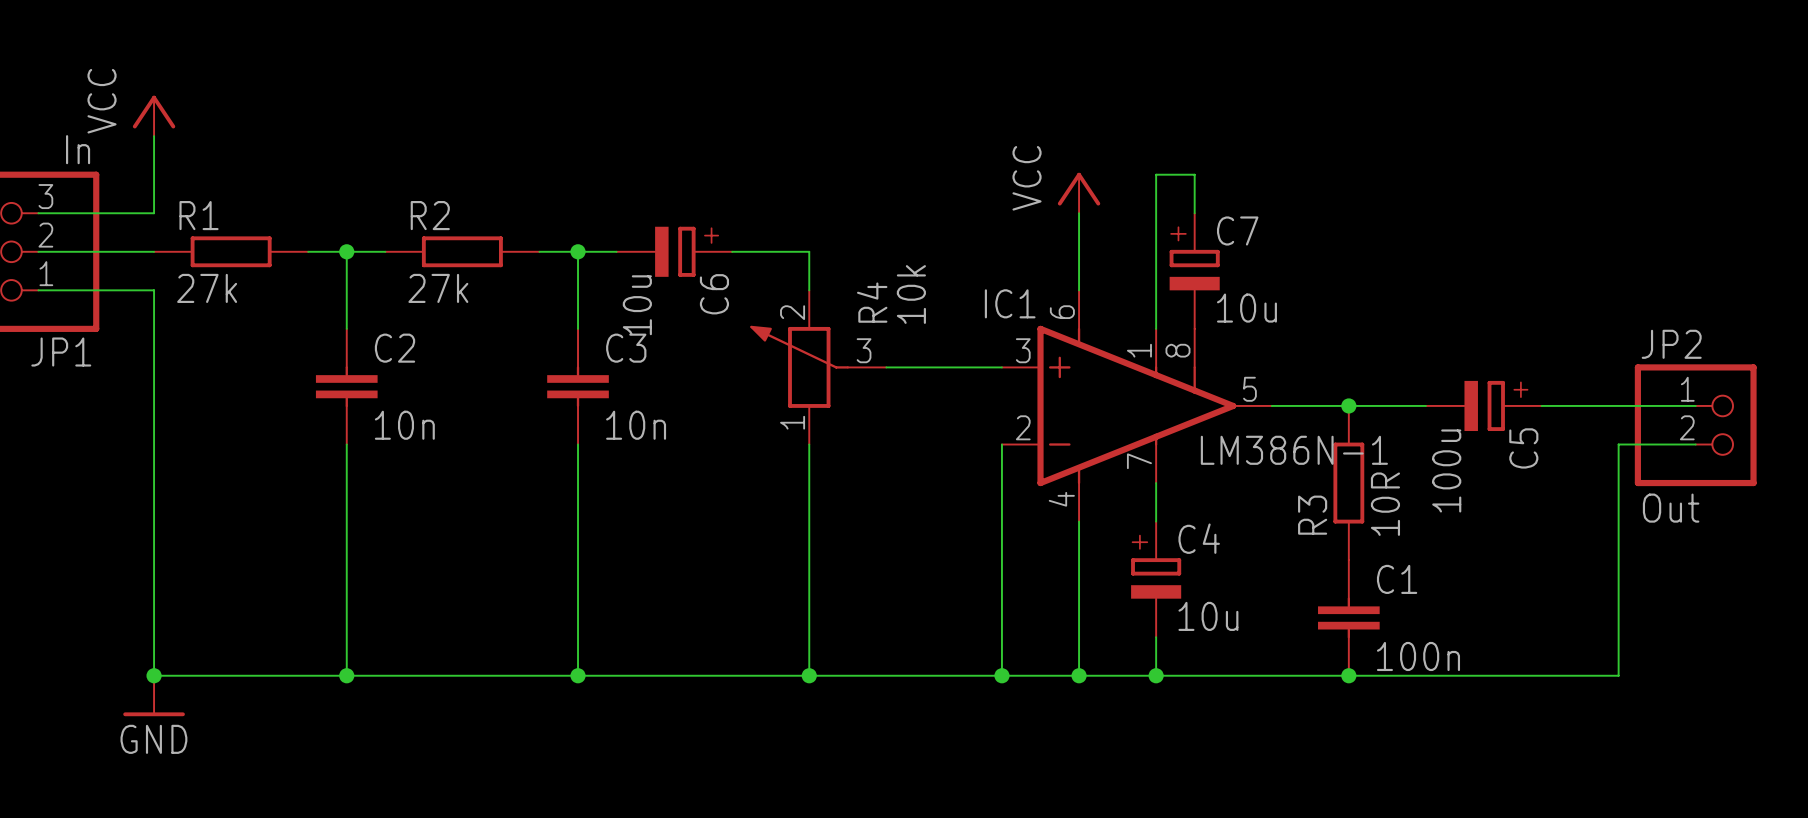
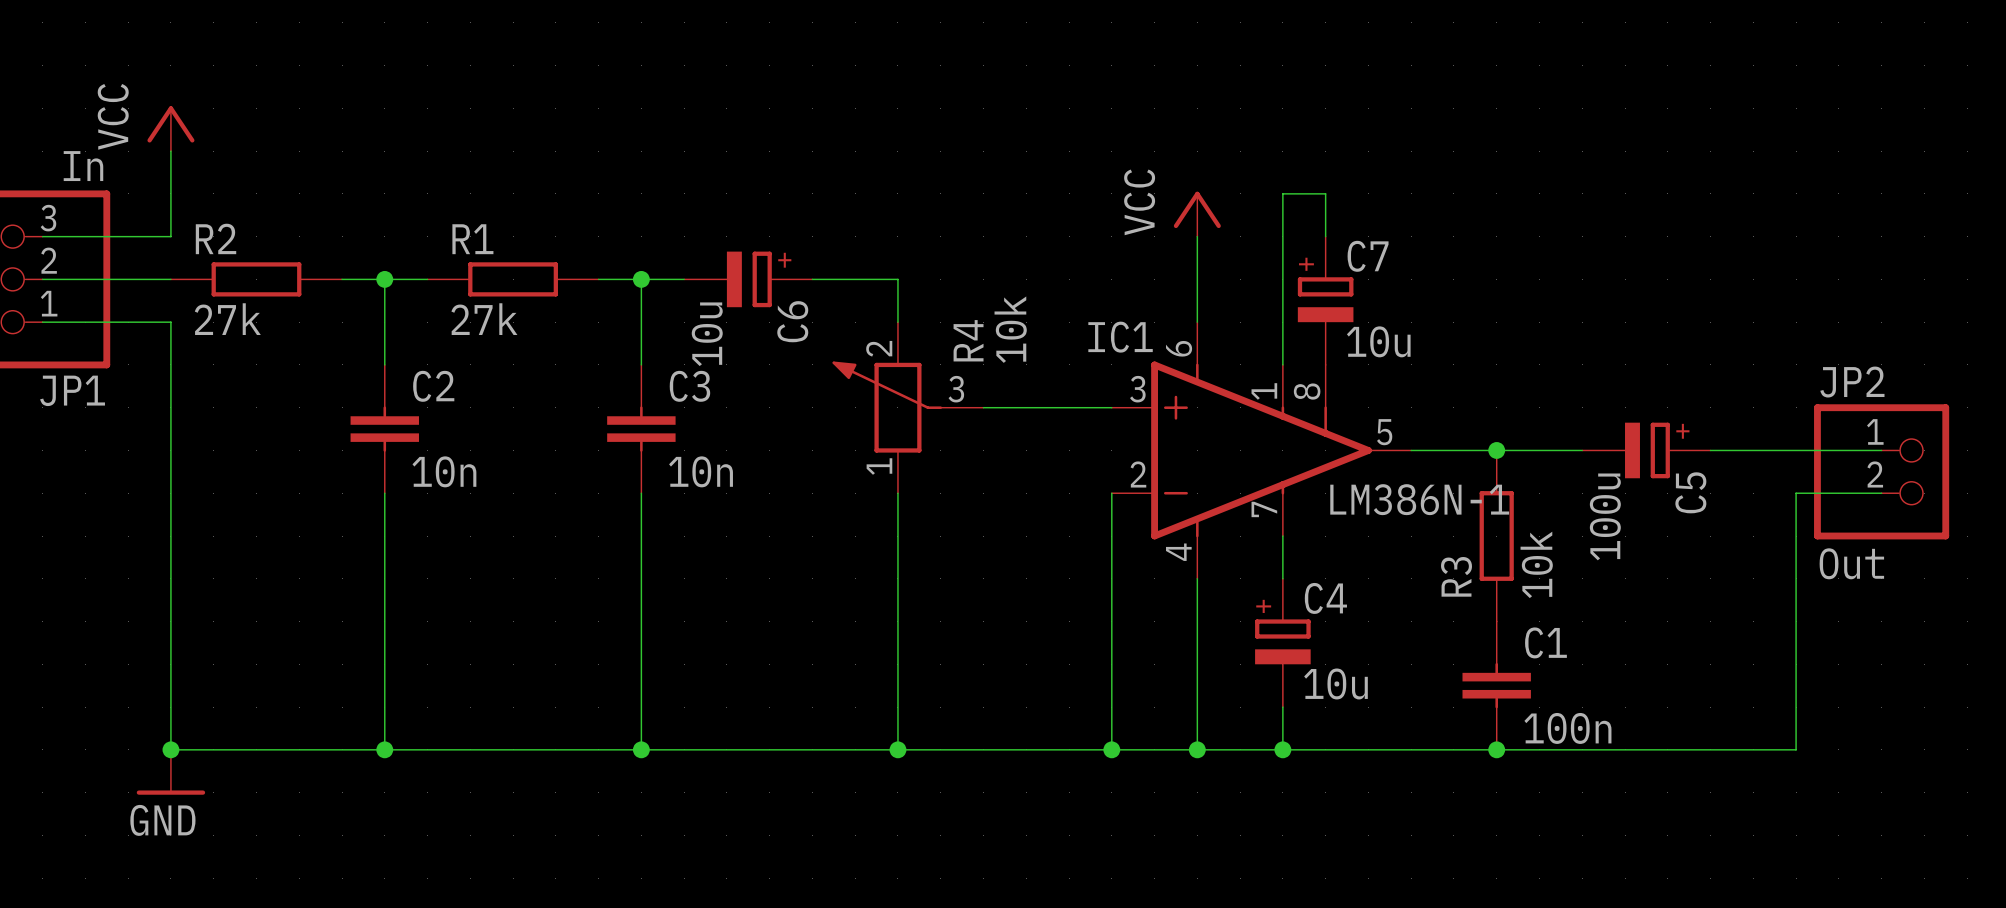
R1 name: R1 (199, 215) -> R2 (216, 238)
R2 name: R2 (430, 215) -> R1 (472, 239)
R3 value: 10R (1385, 504) -> 10k (1536, 564)

